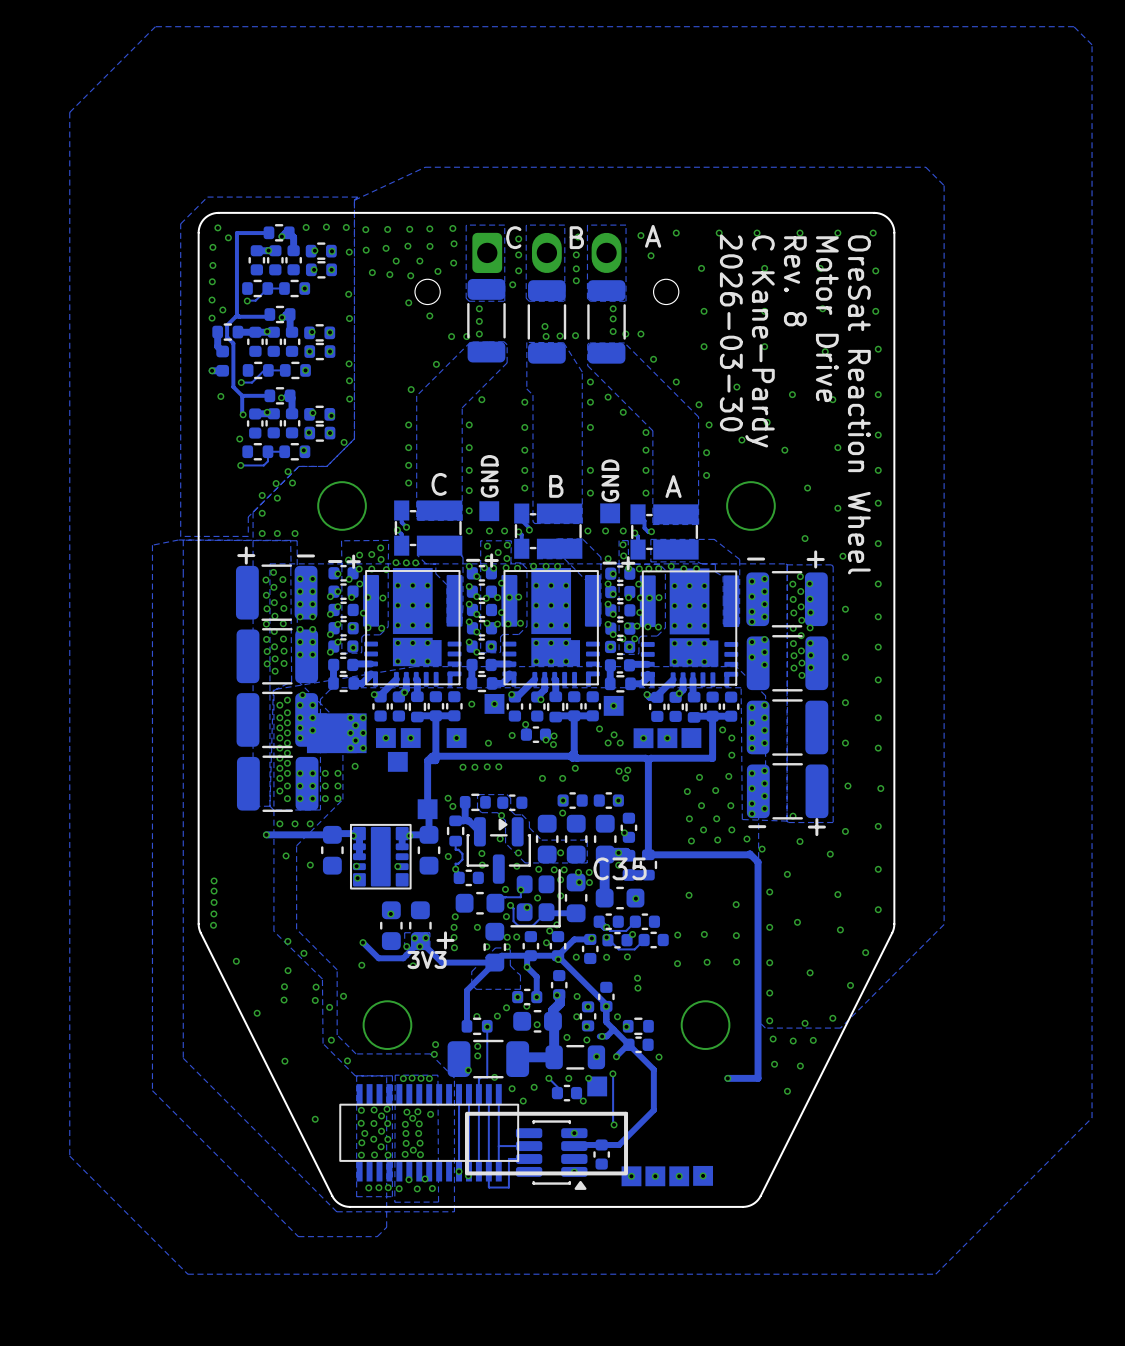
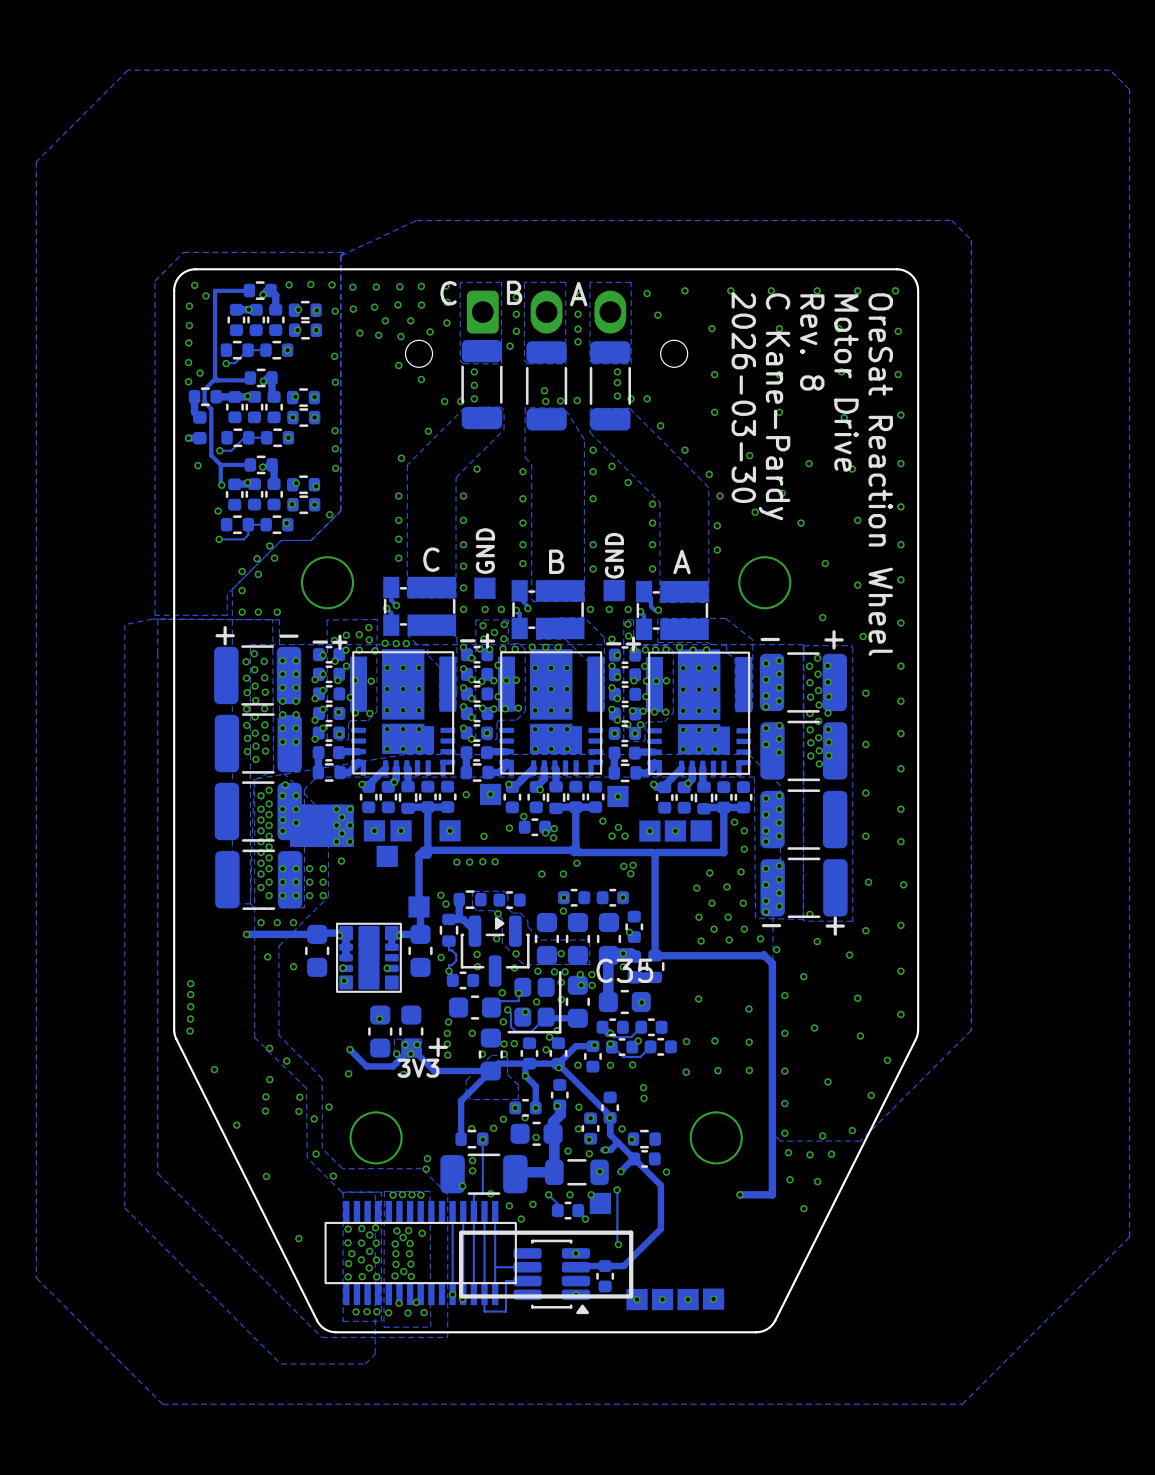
text: none -> B (514, 292)
text: A (653, 236) -> none
text position: C (513, 237) -> C (448, 293)
text: B (576, 237) -> A (578, 294)

